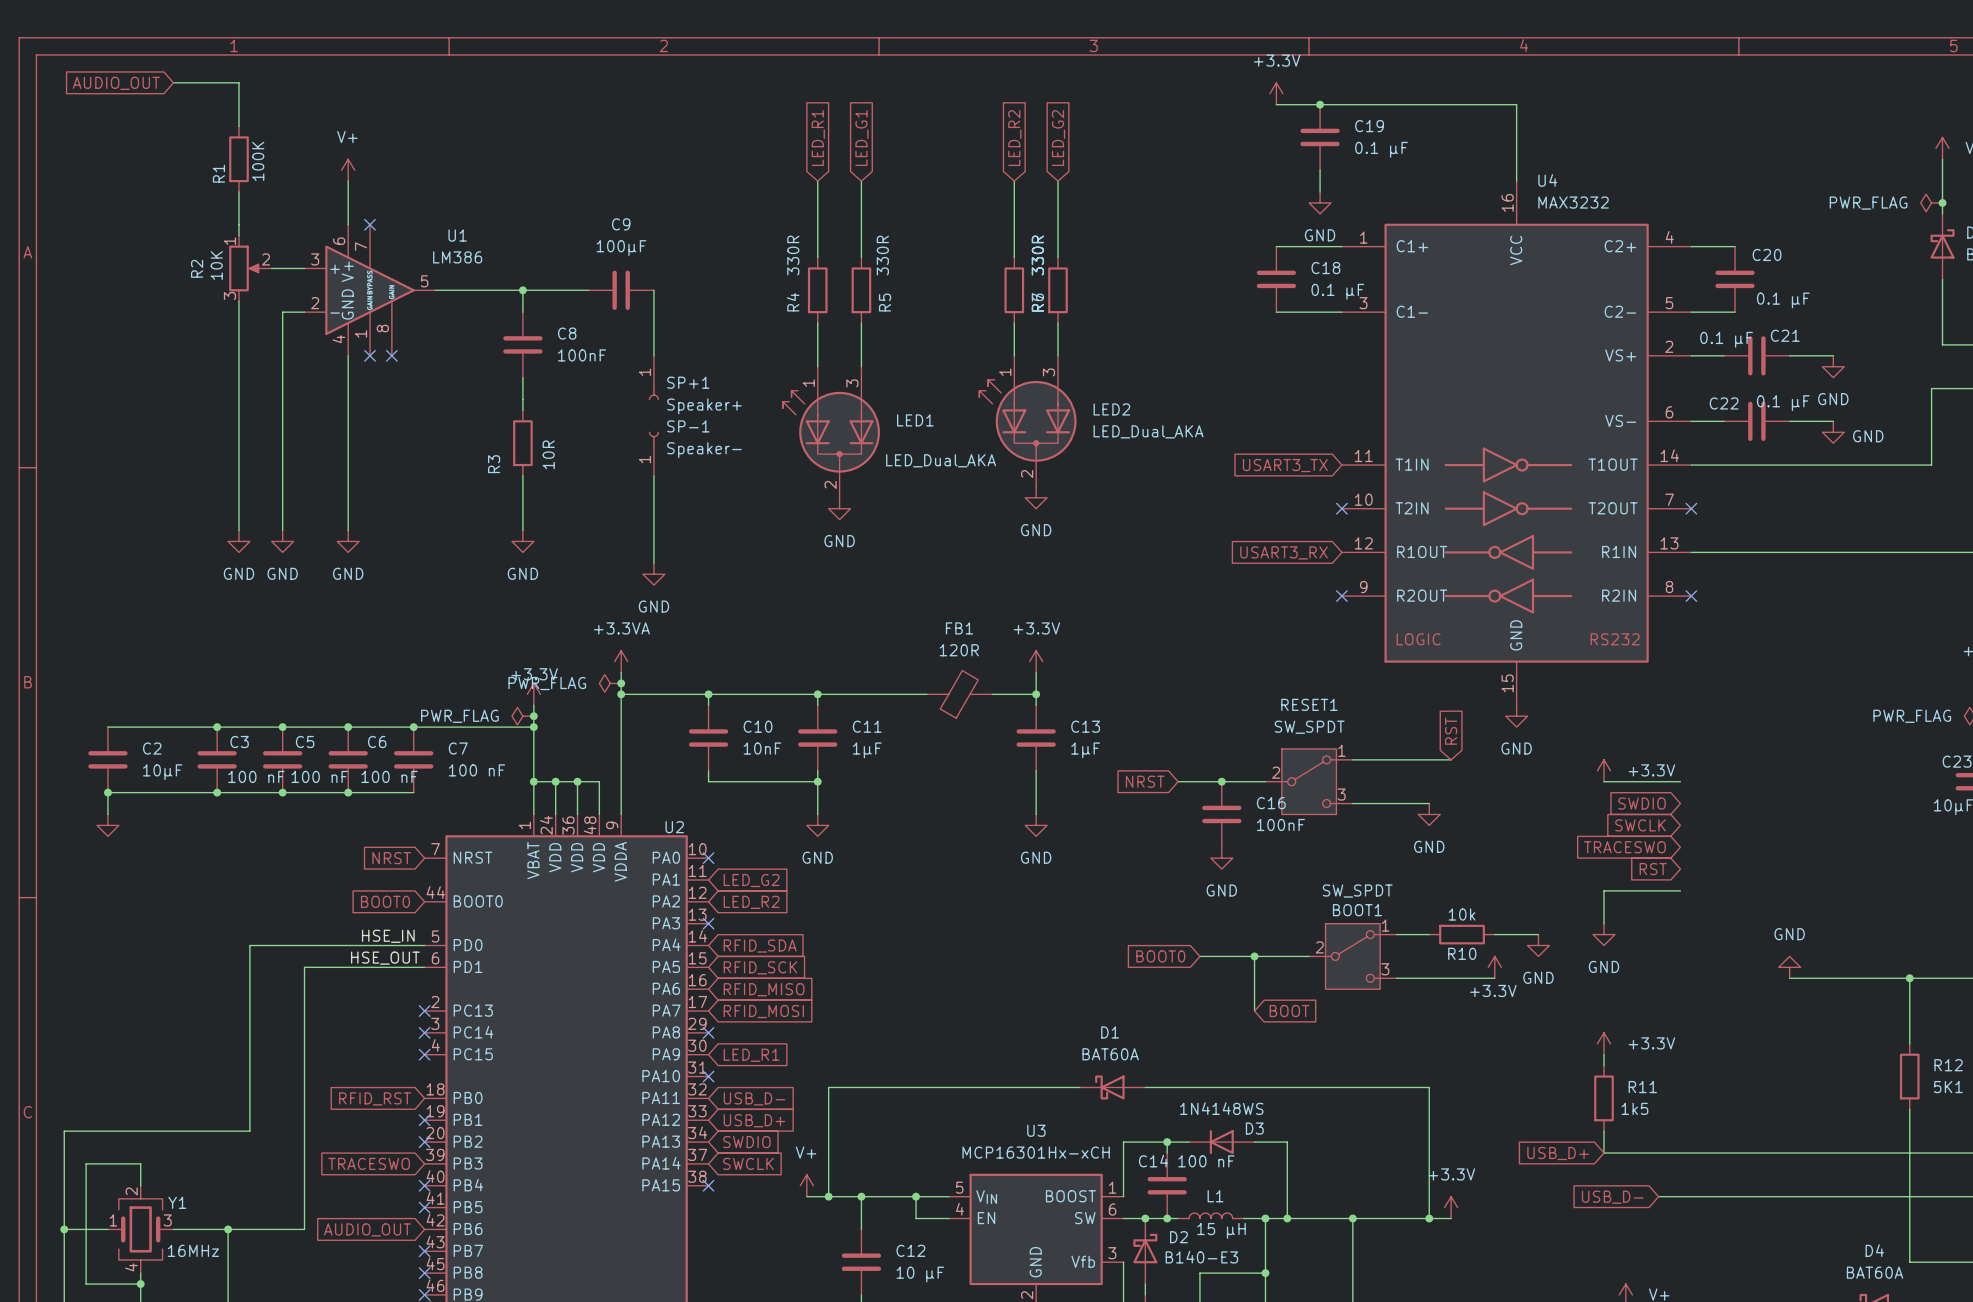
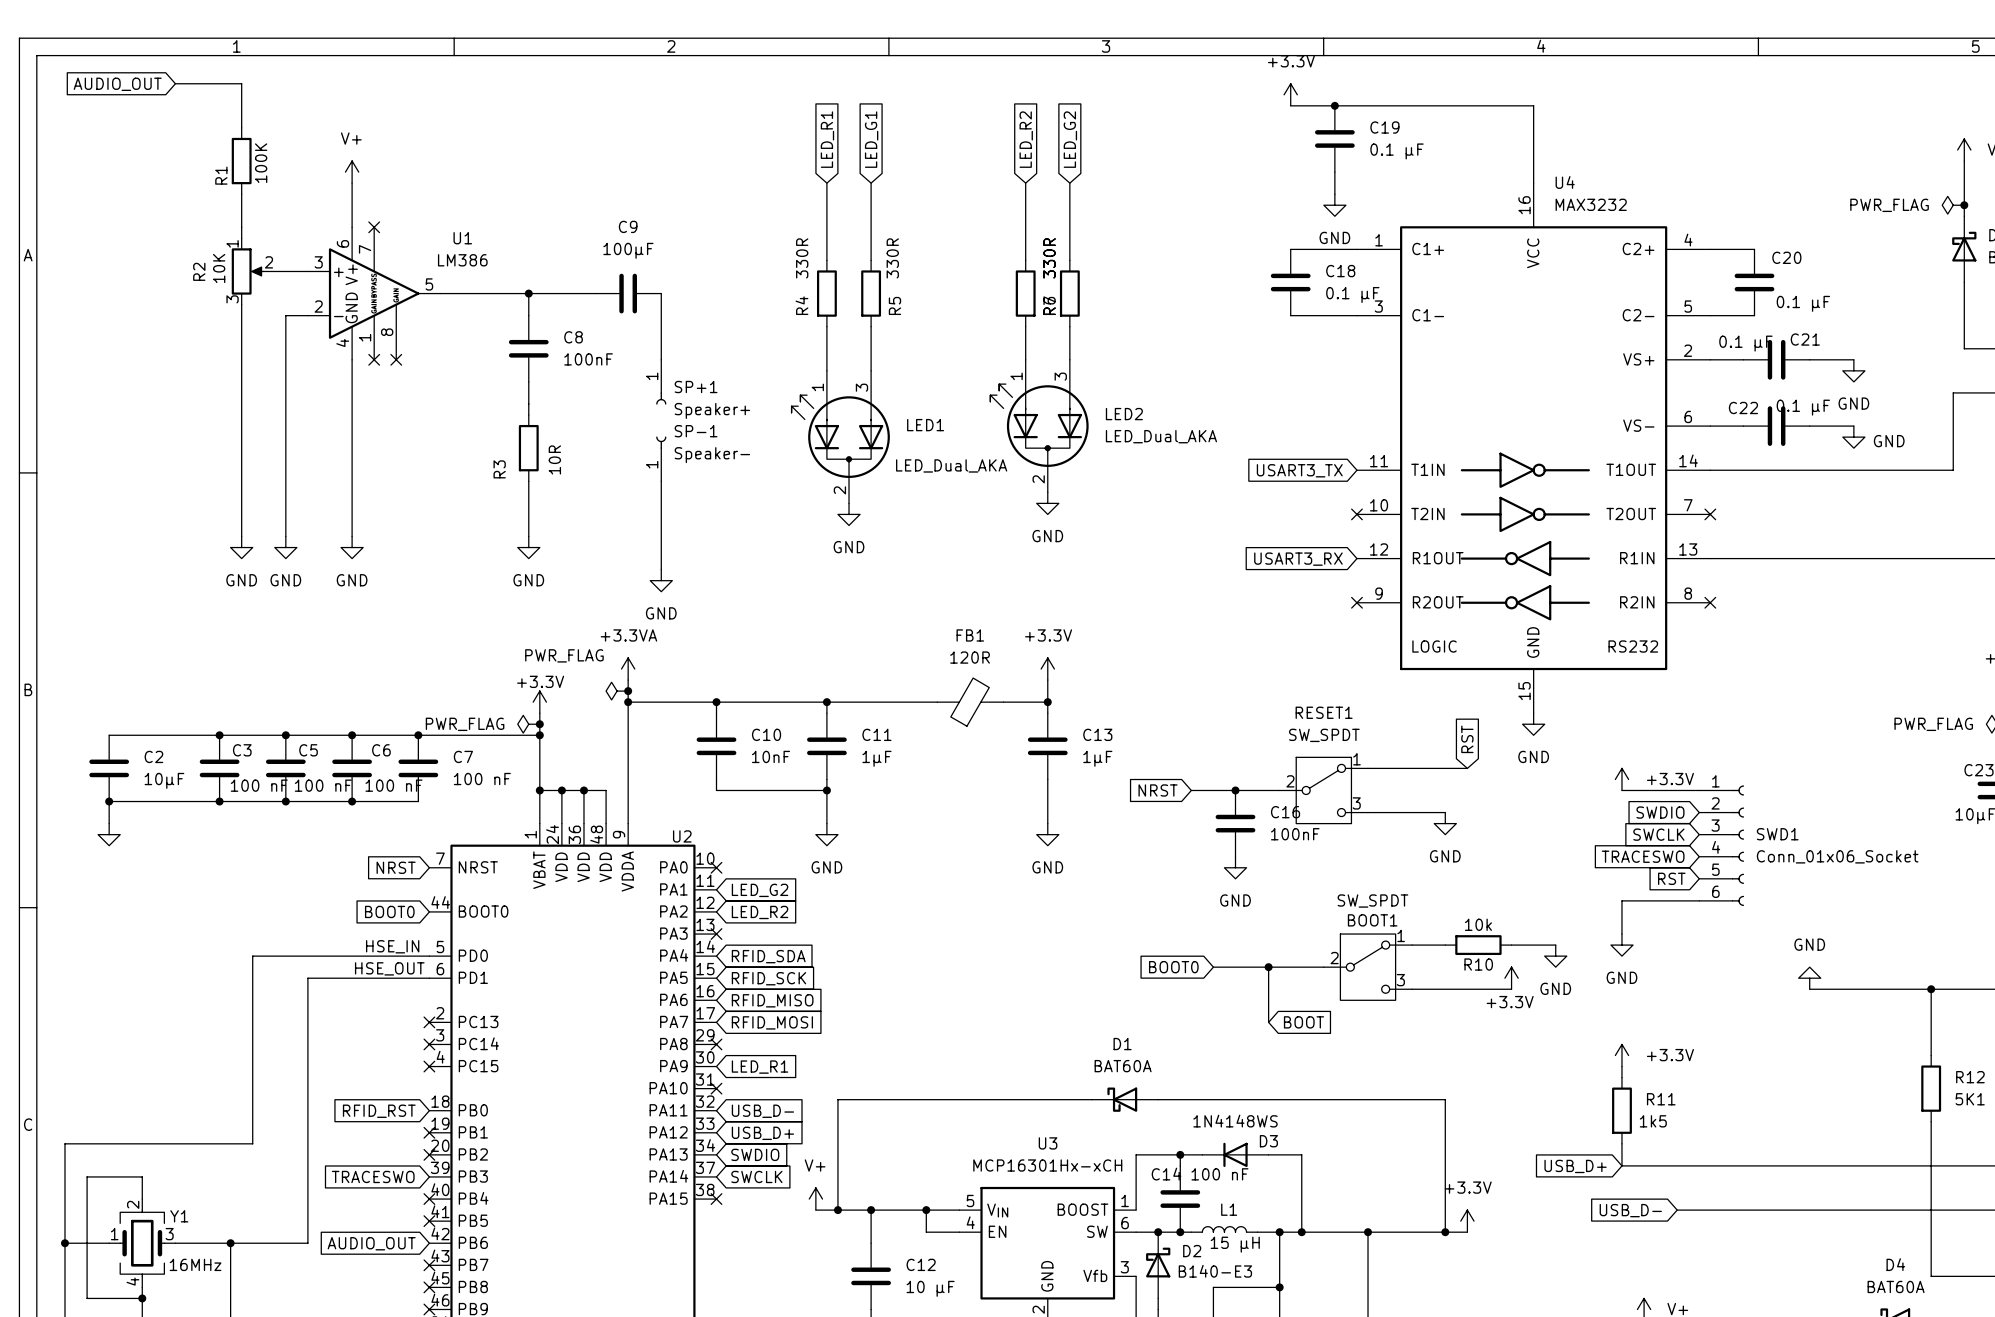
power symbol text position: PWR_FLAG (547, 683) -> PWR_FLAG (564, 655)
SWD1: none -> Conn_01x06_Socket (1721, 845)

